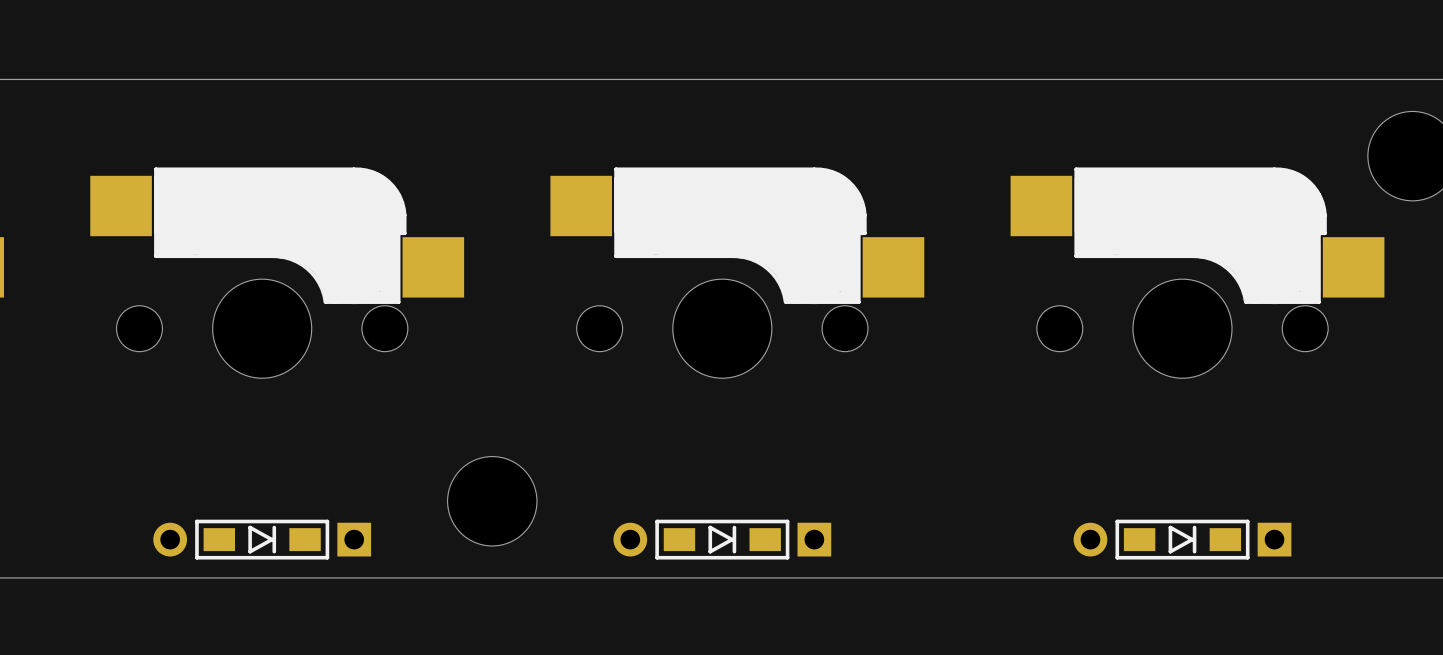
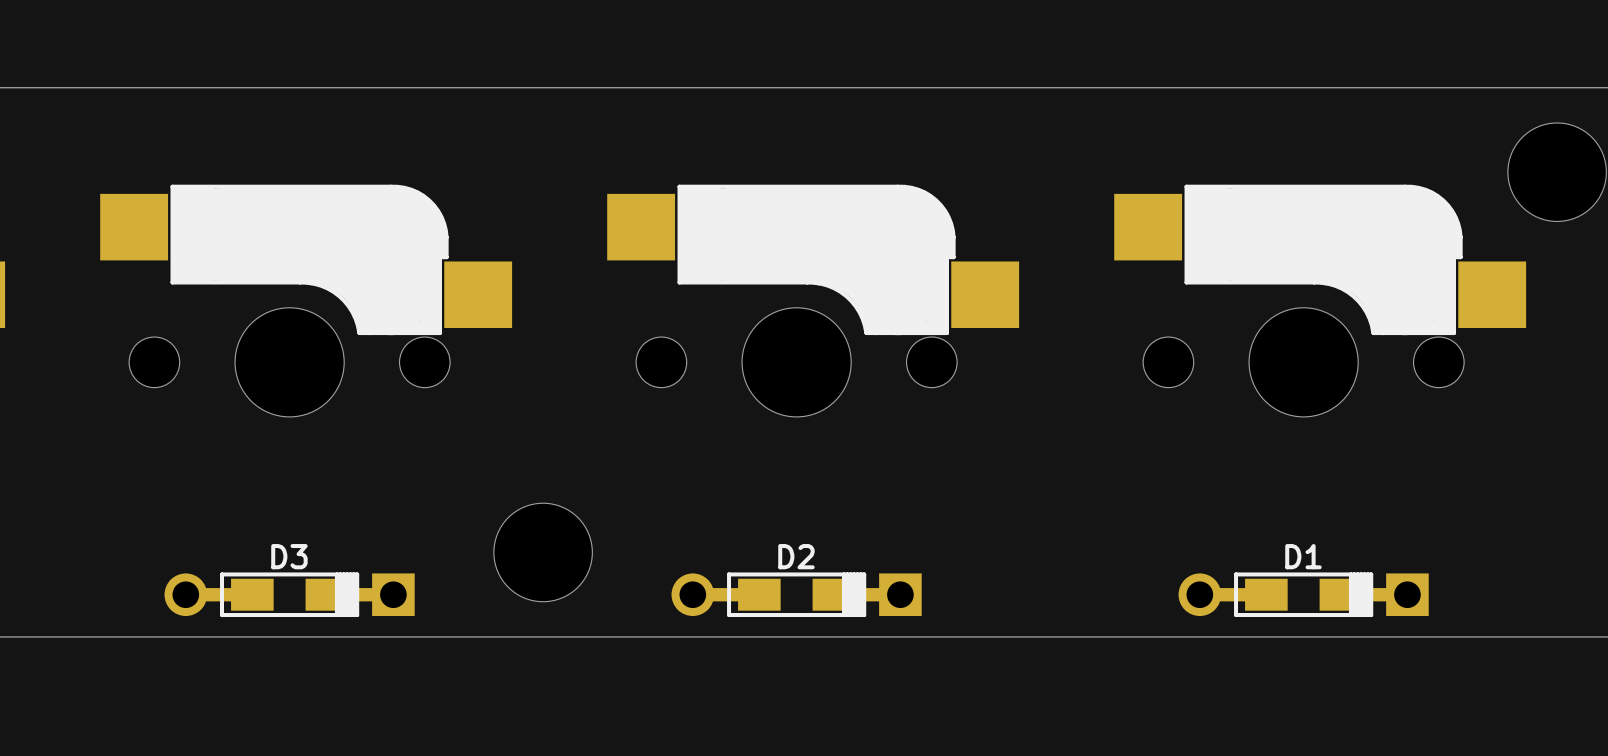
part: (262, 539) -> none
D3: none -> (289, 594)
part: (722, 539) -> none
D2: none -> (796, 594)
part: (1182, 539) -> none
D1: none -> (1303, 594)

